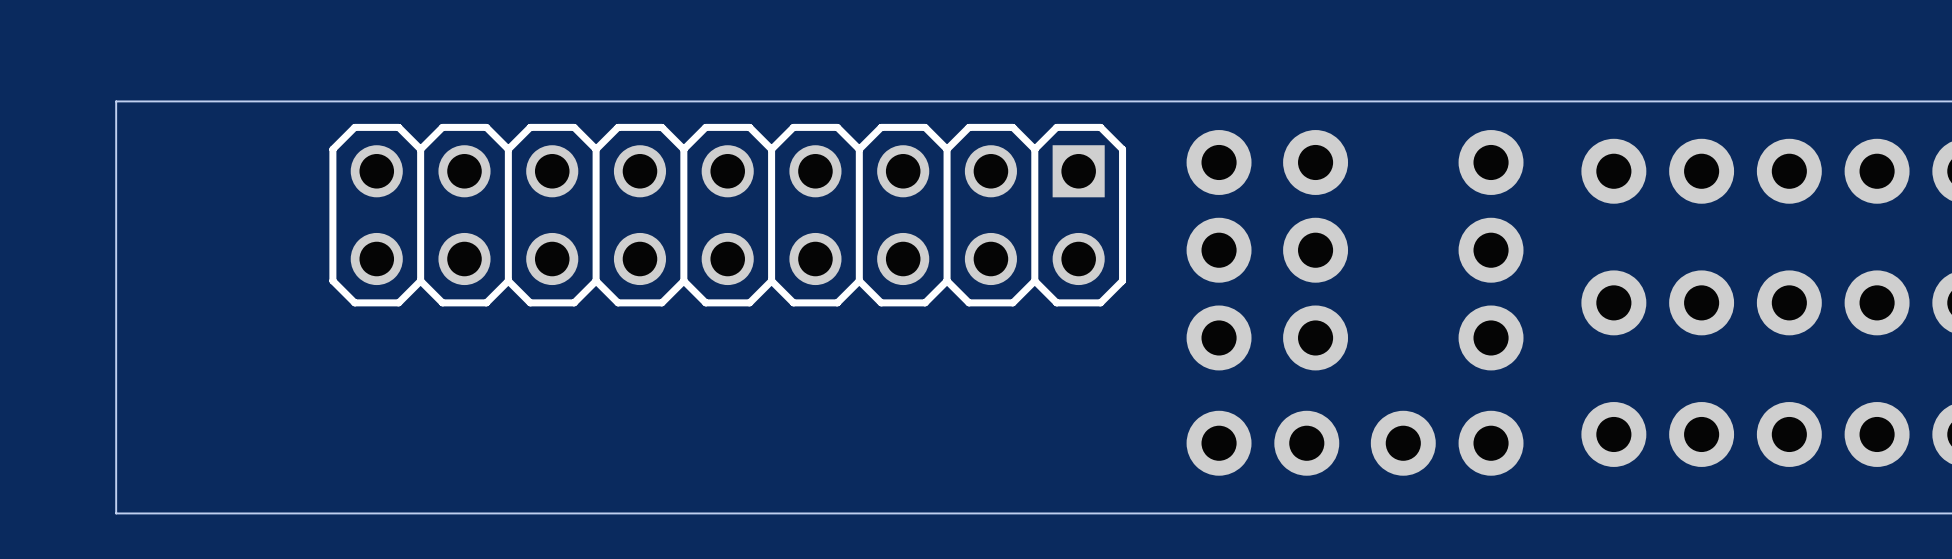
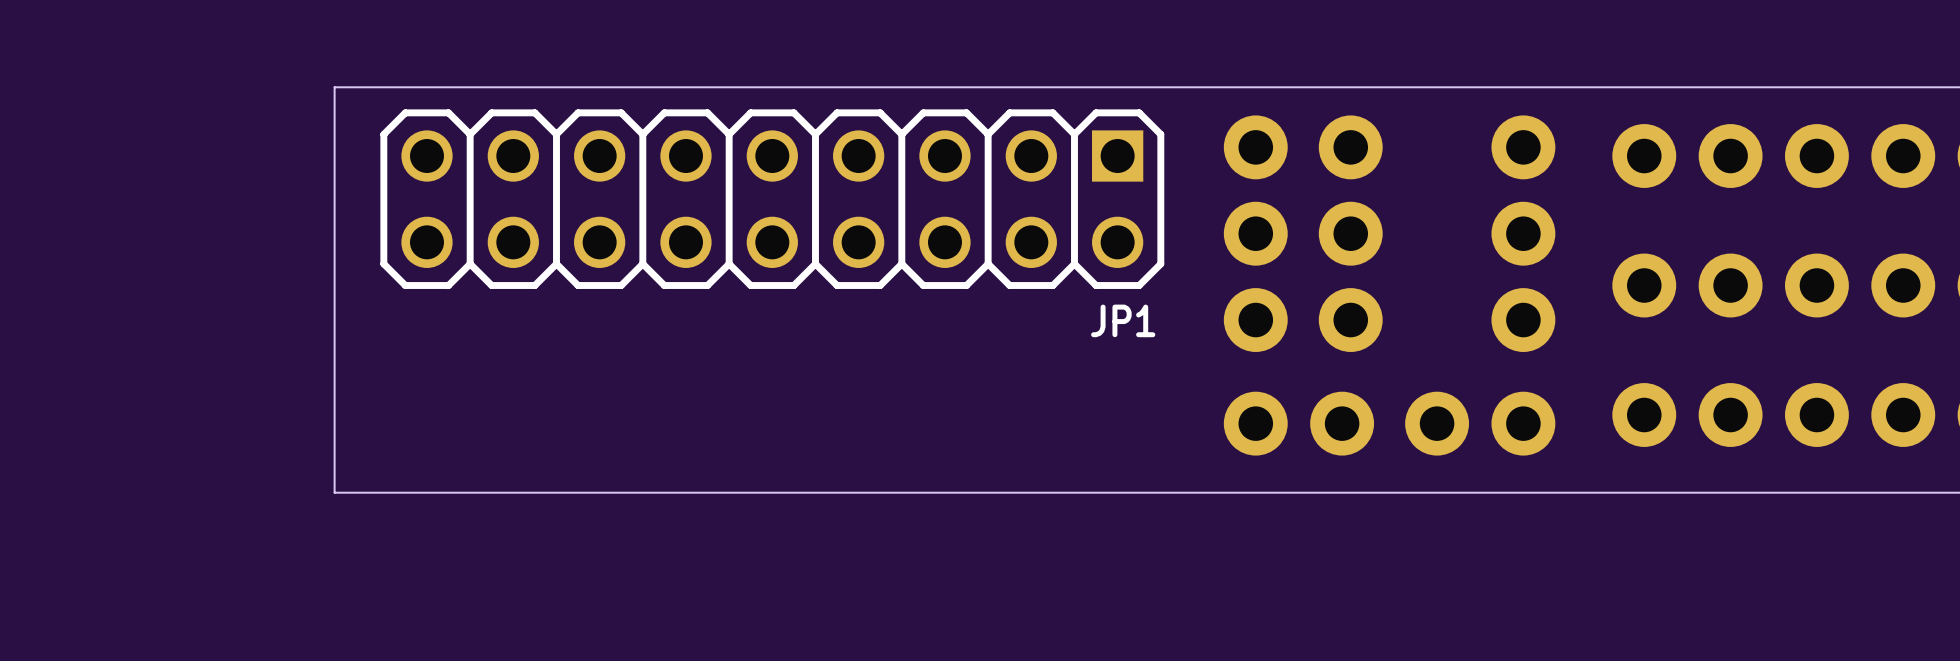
board edge: (282, 101) (116, 101) (116, 513) (282, 513) -> (334, 87) (334, 492)
JP1 name: none -> JP1 (1123, 320)

